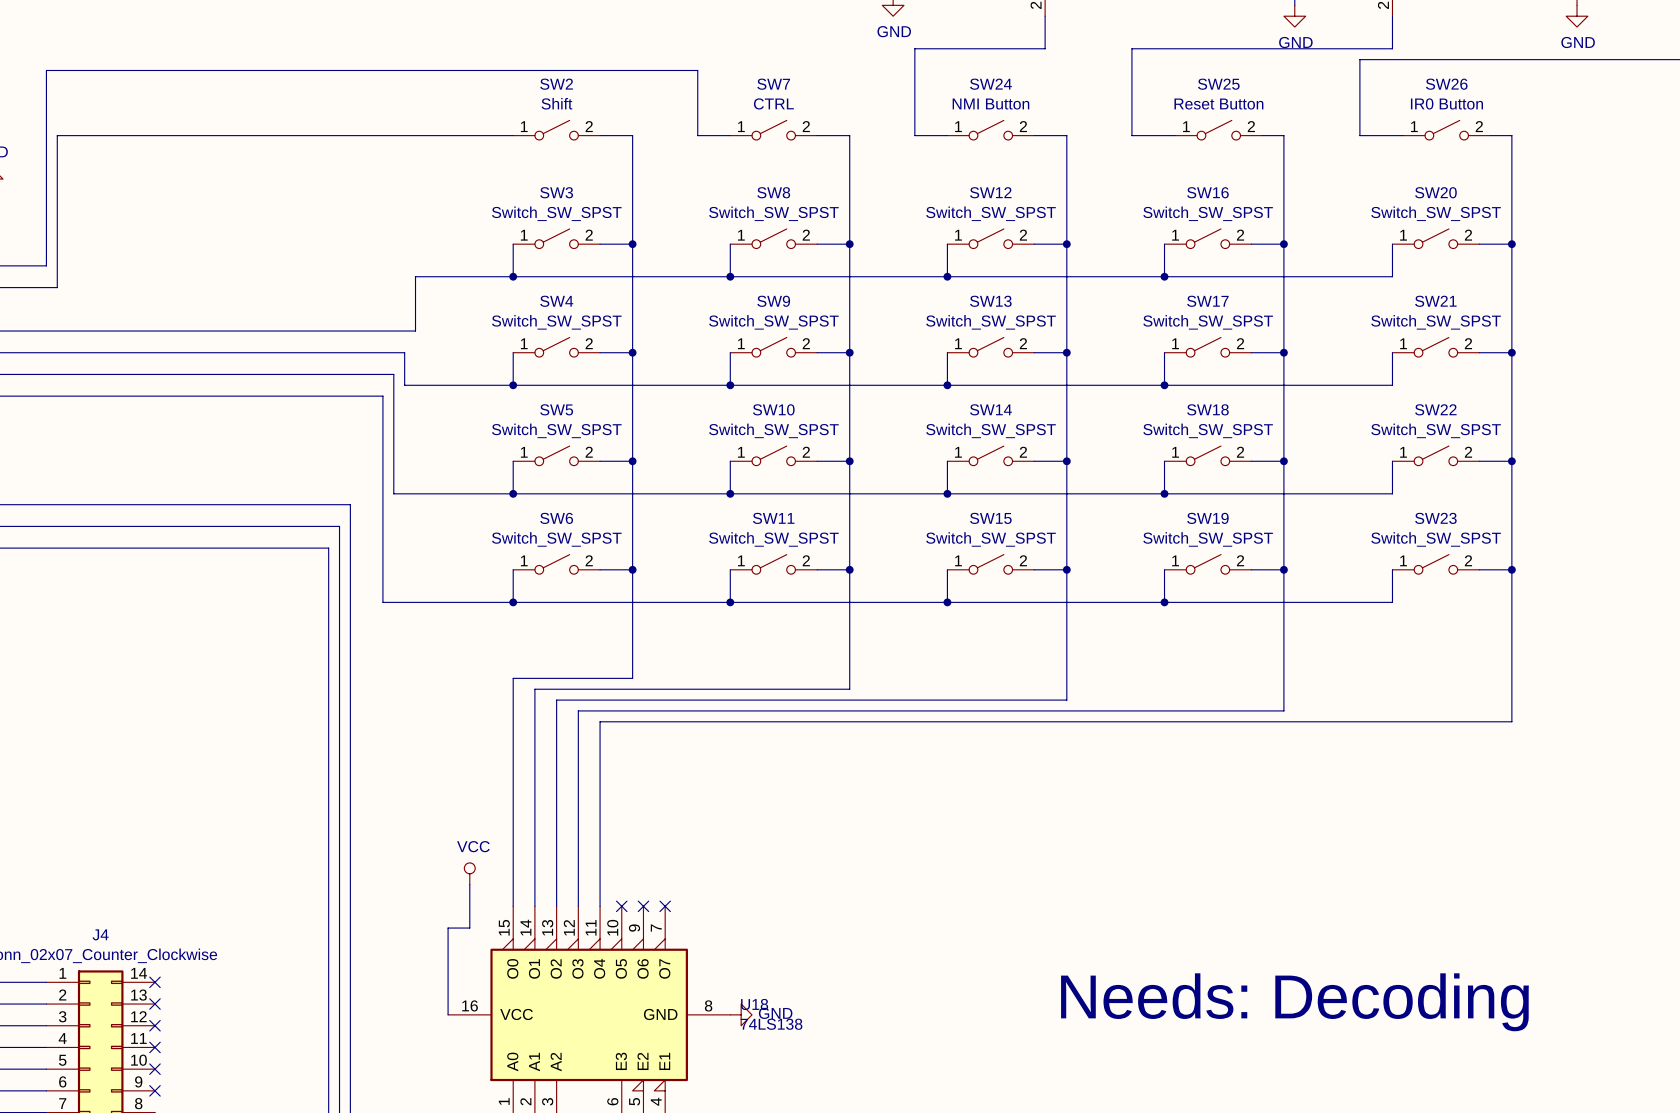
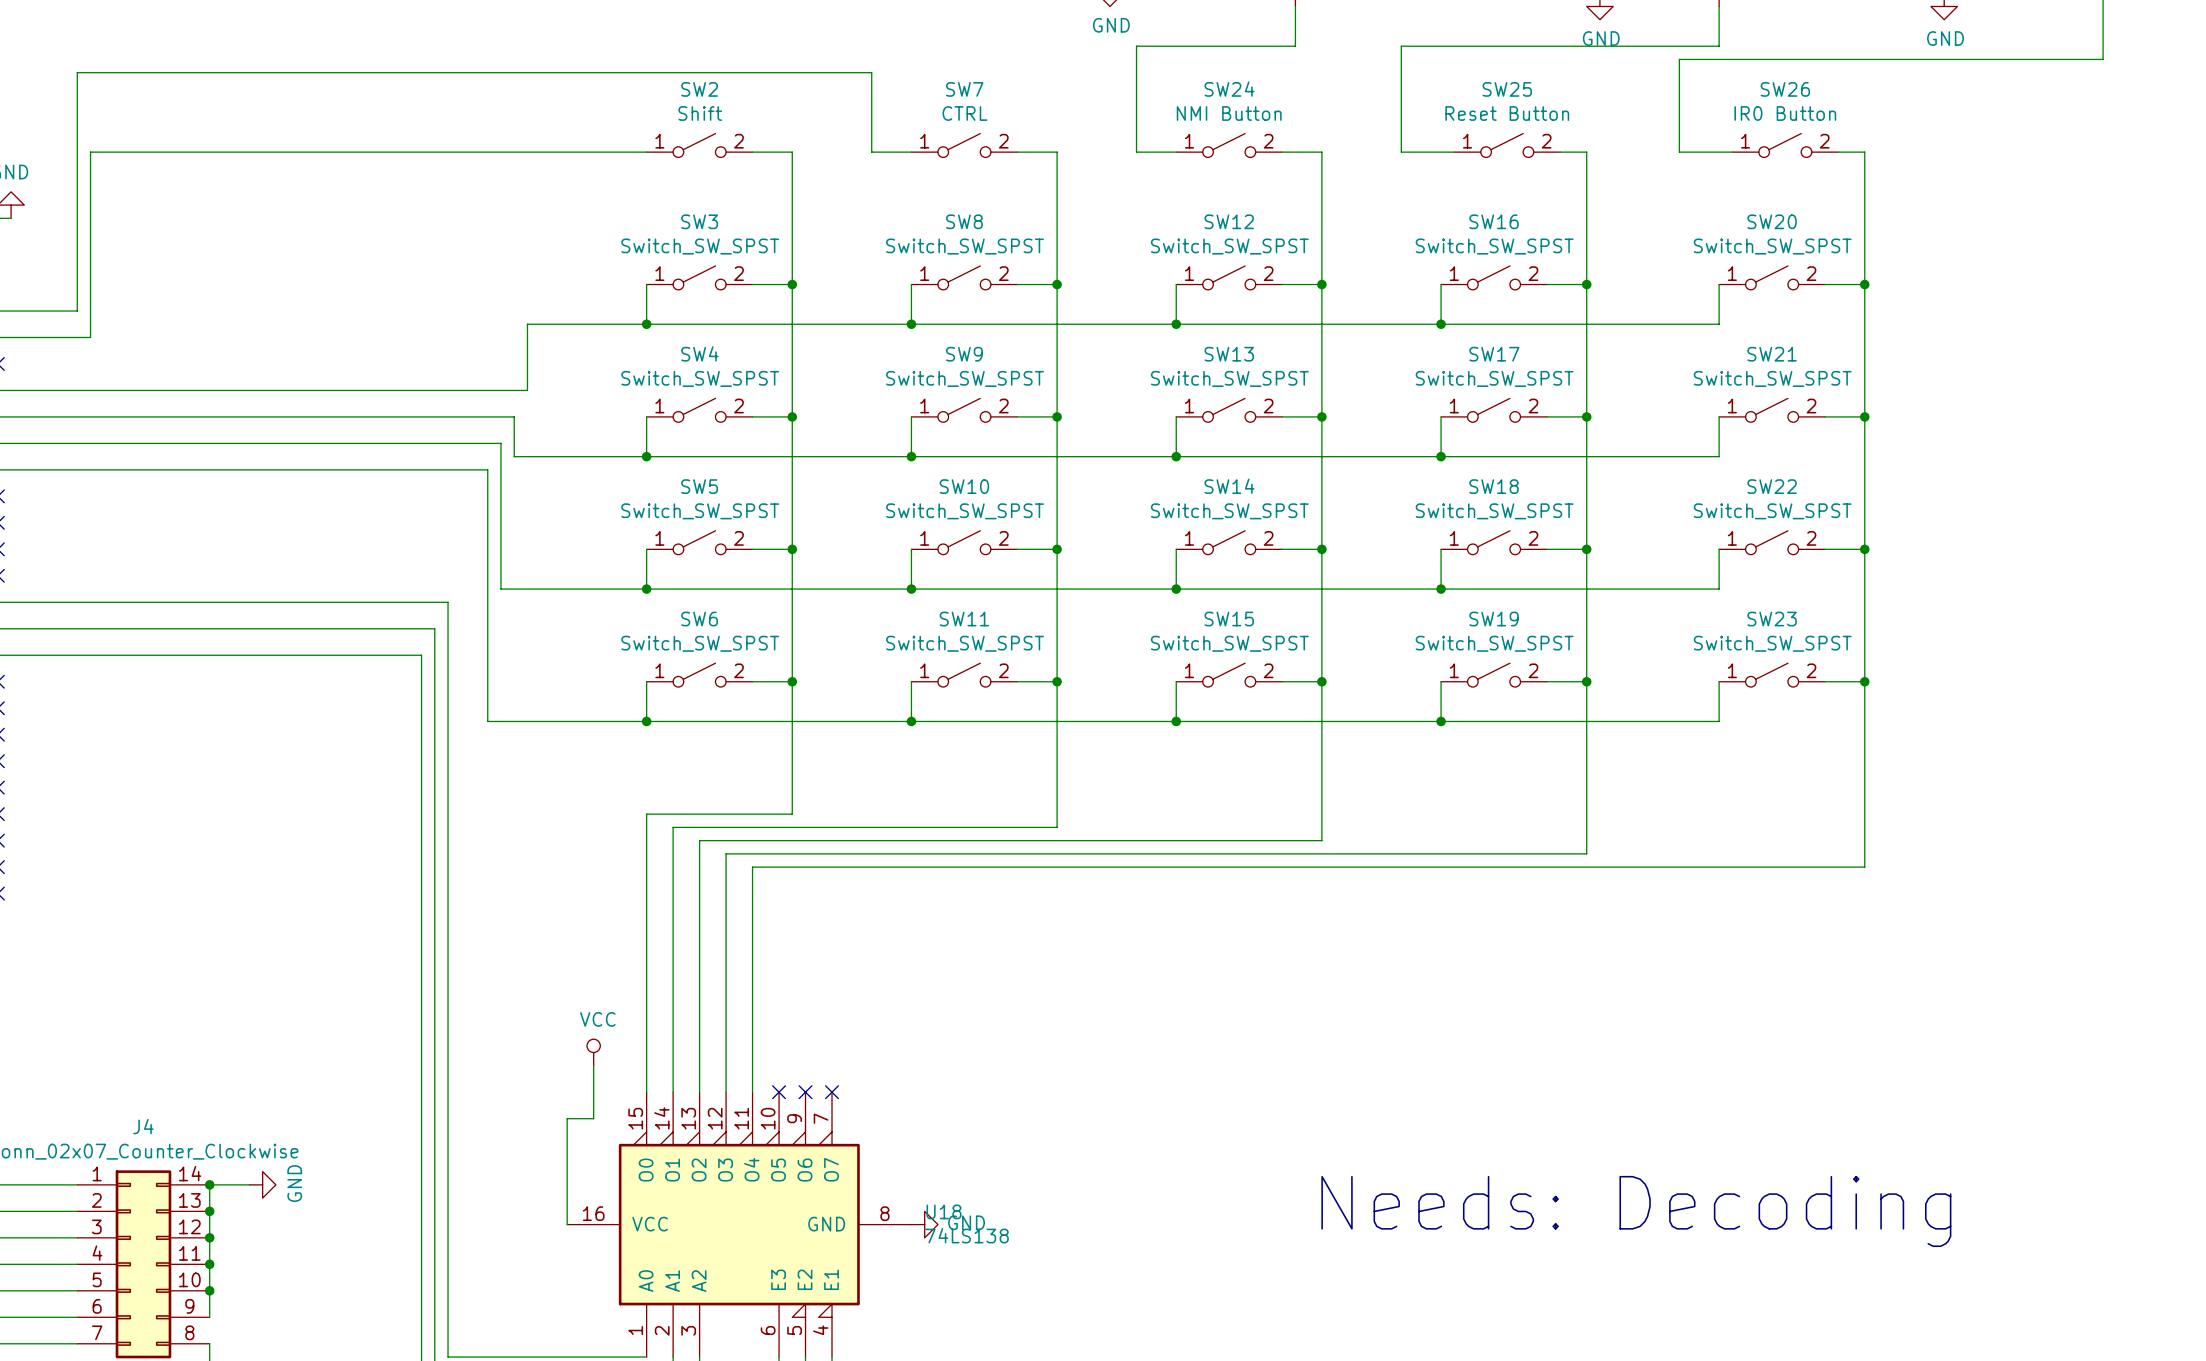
no-connect mark: (154, 982) -> none
junction: none -> (209, 1184)
wire: none -> (249, 1184) (209, 1184) (209, 1317)
power symbol: none -> GND (262, 1184)
no-connect mark: (154, 1004) -> none
junction: none -> (209, 1211)
no-connect mark: (154, 1025) -> none
junction: none -> (209, 1237)
no-connect mark: (154, 1047) -> none
junction: none -> (209, 1264)
no-connect mark: (154, 1069) -> none
junction: none -> (209, 1290)
no-connect mark: (154, 1090) -> none

